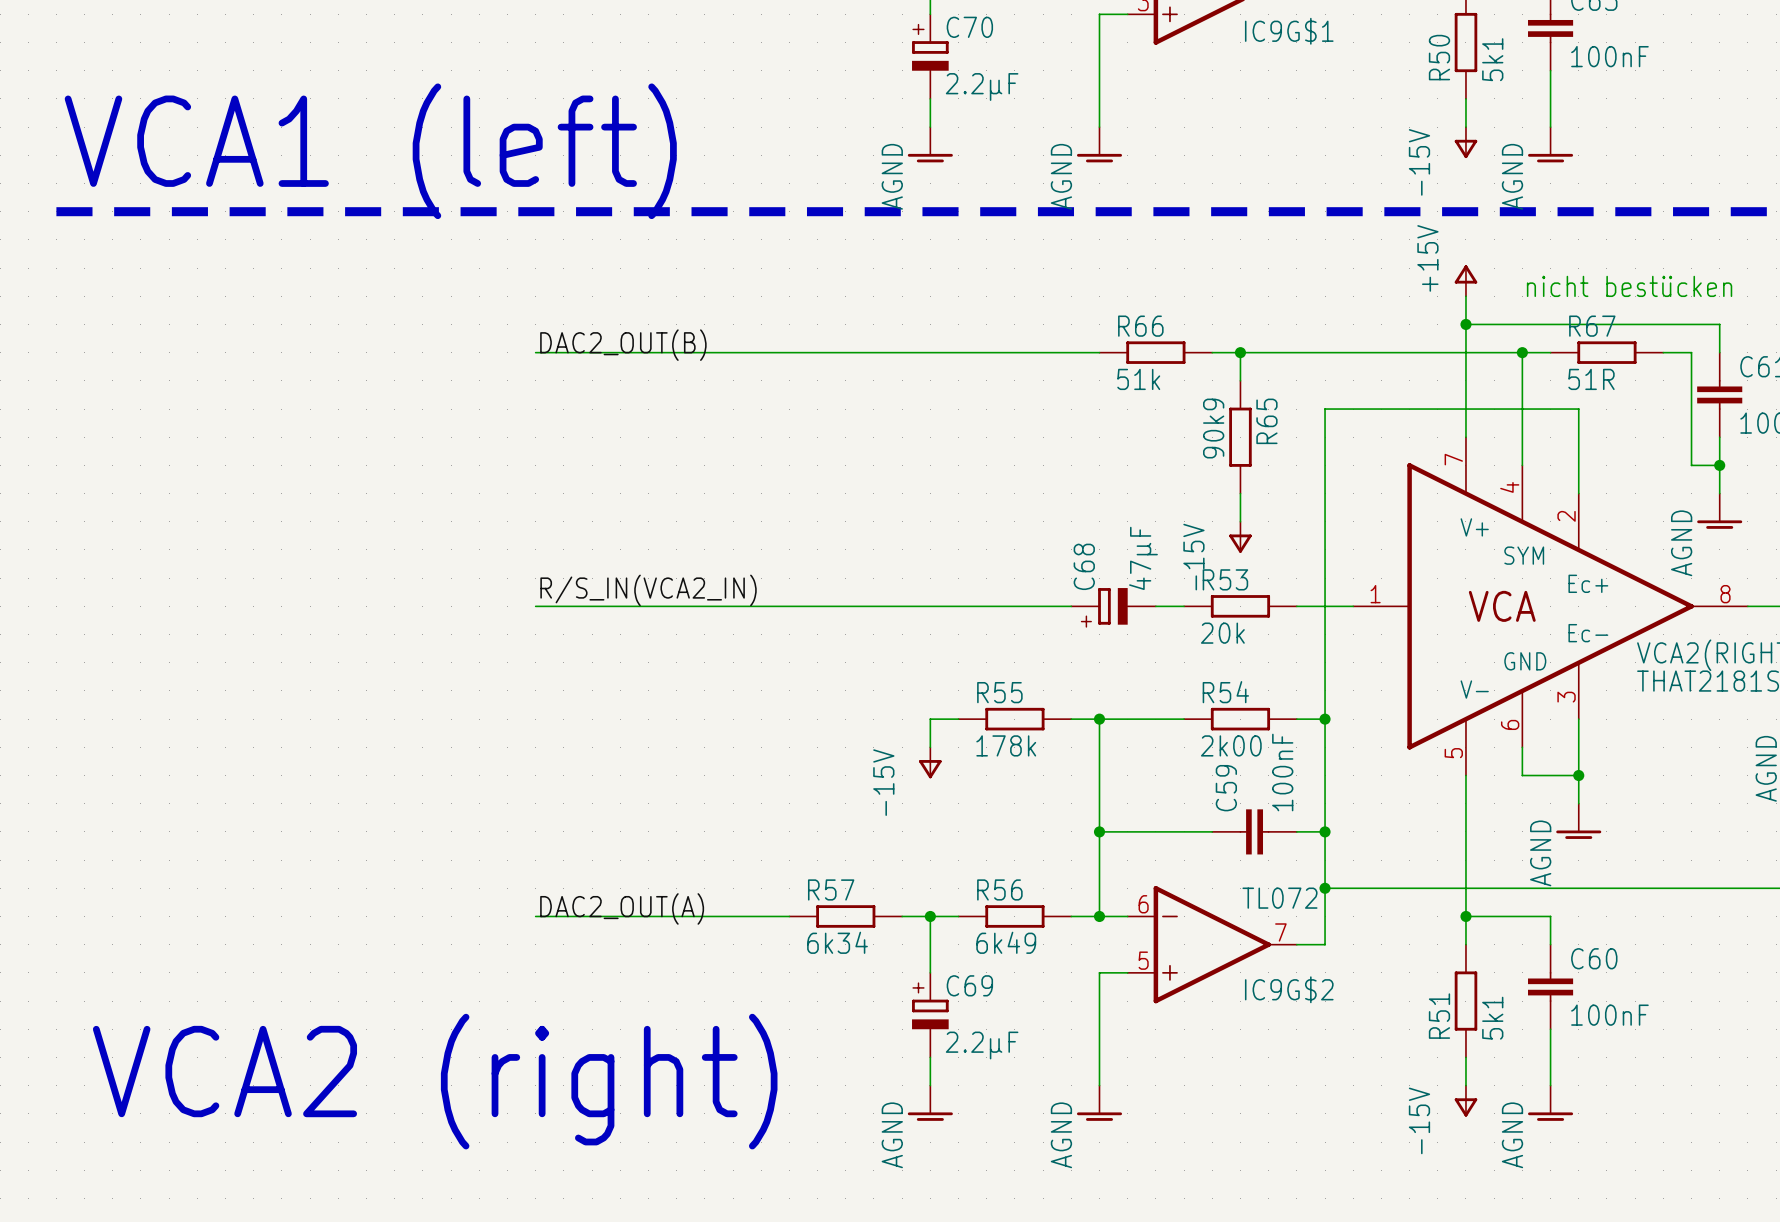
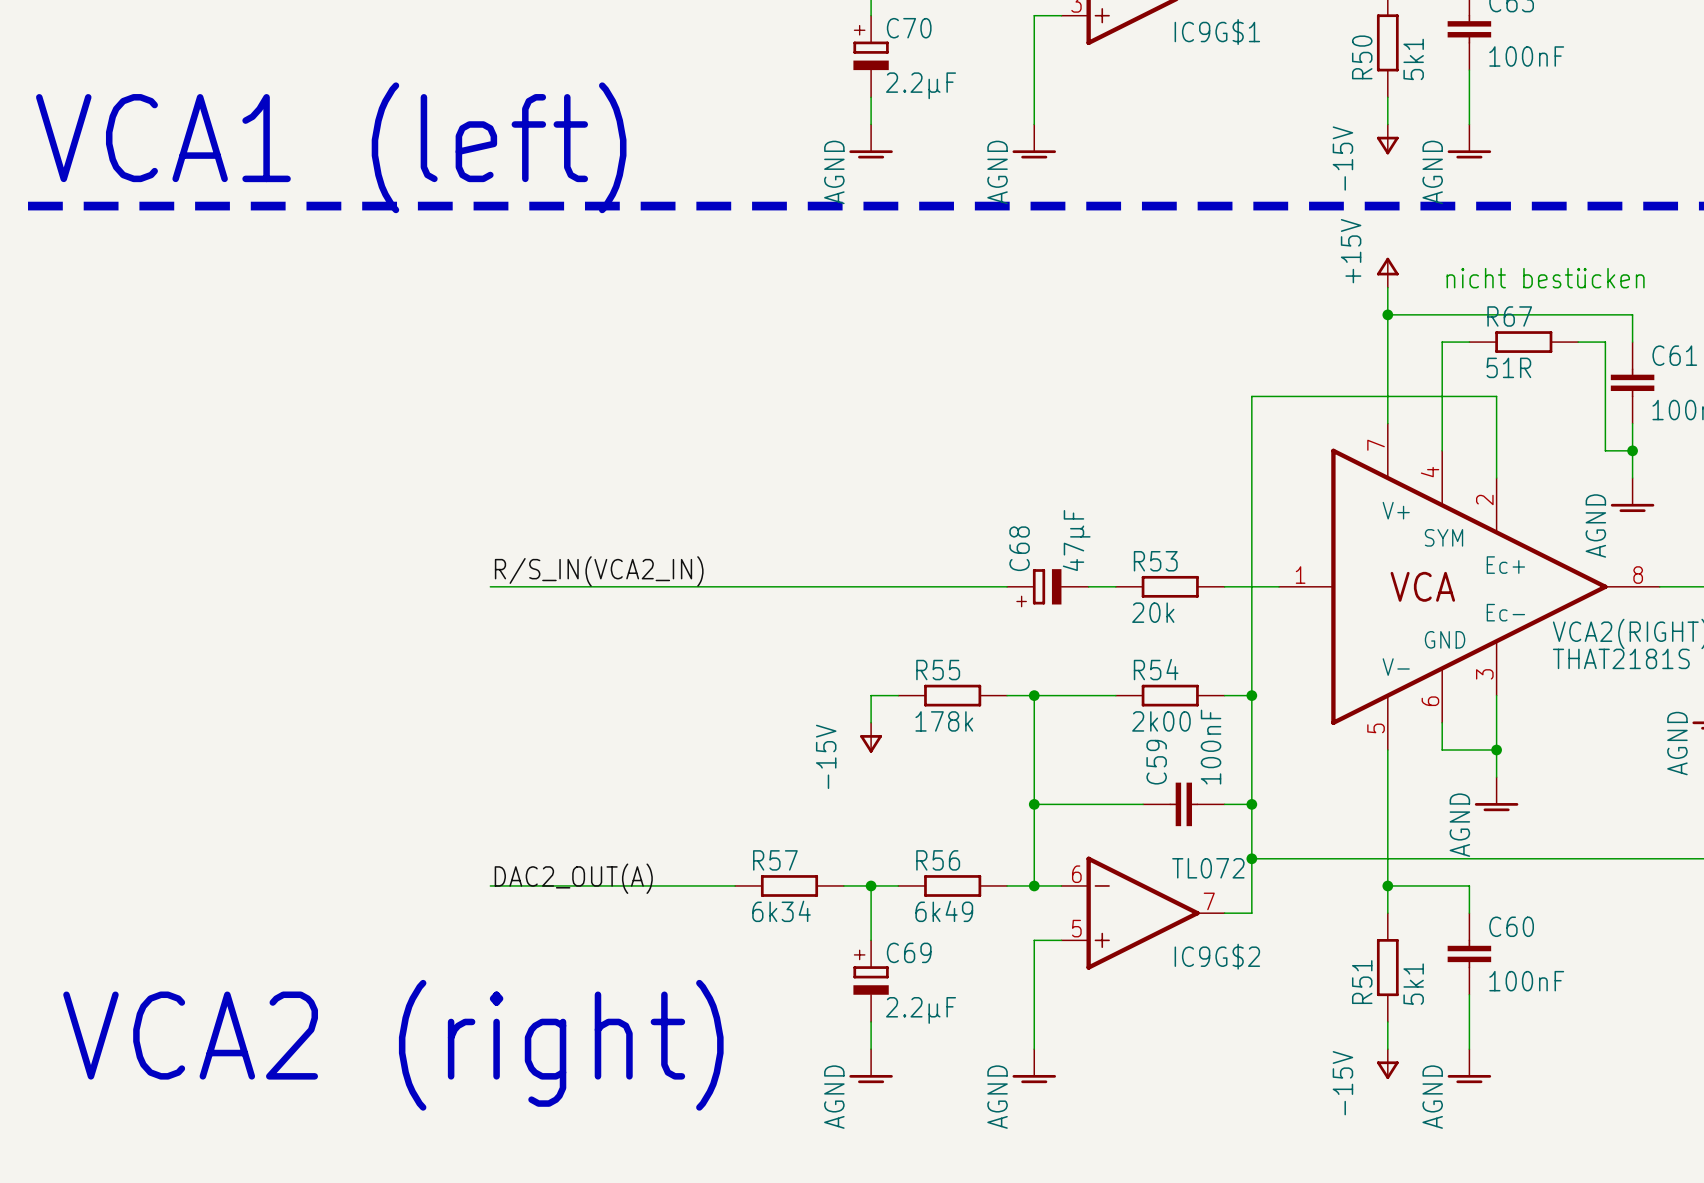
label: DAC2_OUT(B) (623, 345) -> none
wire: (535, 352) (1099, 352) -> none
R66: 51k (1155, 352) -> none
wire: (1212, 352) (1522, 352) -> none
wire: (1240, 352) (1240, 380) -> none
junction: (1240, 352) -> none
junction: (1522, 352) -> none
R65: 90k9 (1240, 437) -> none
wire: (1240, 493) (1240, 521) -> none
power symbol: -15V (1240, 537) -> none

